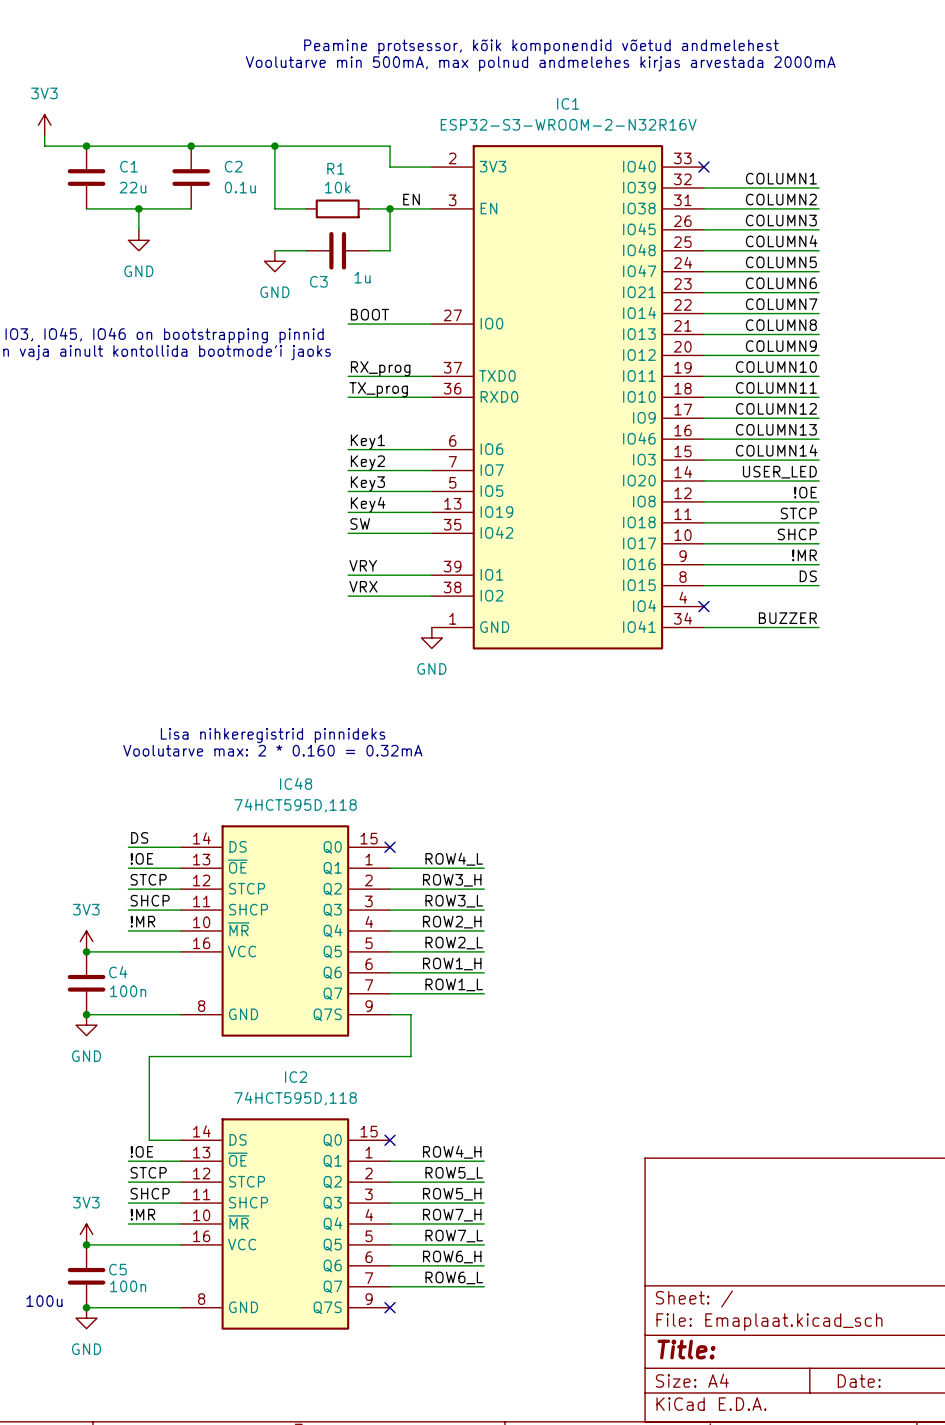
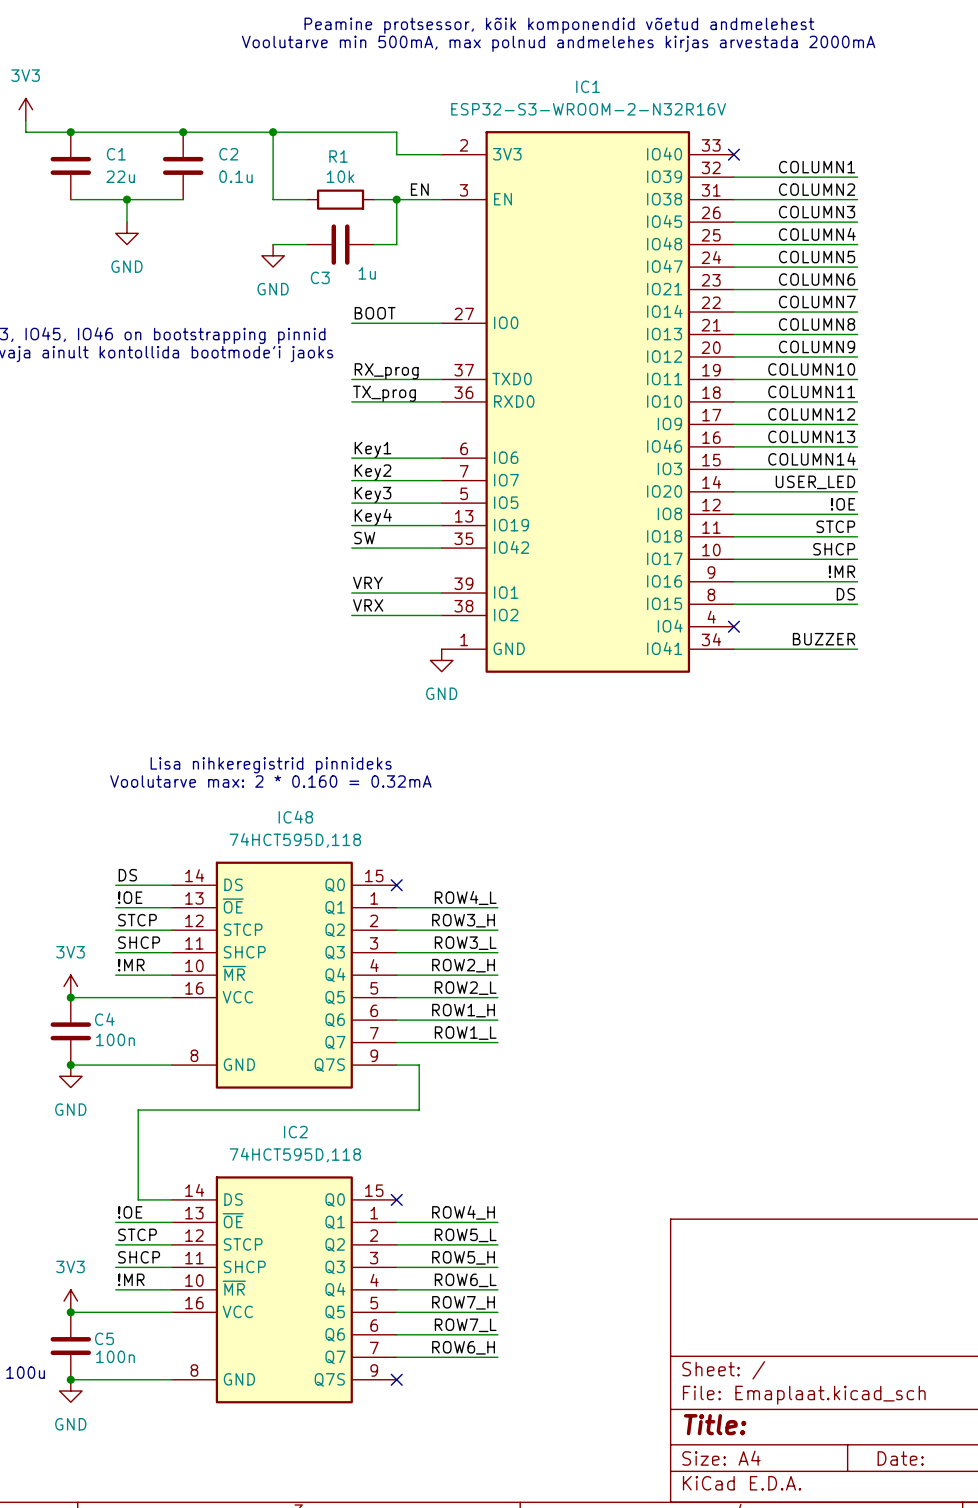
label: ROW7_H (452, 1215) -> ROW6_L (465, 1280)
label: ROW7_L (454, 1236) -> ROW7_H (463, 1302)
label: ROW6_H (452, 1257) -> ROW7_L (465, 1325)
label: ROW6_L (454, 1277) -> ROW6_H (463, 1347)

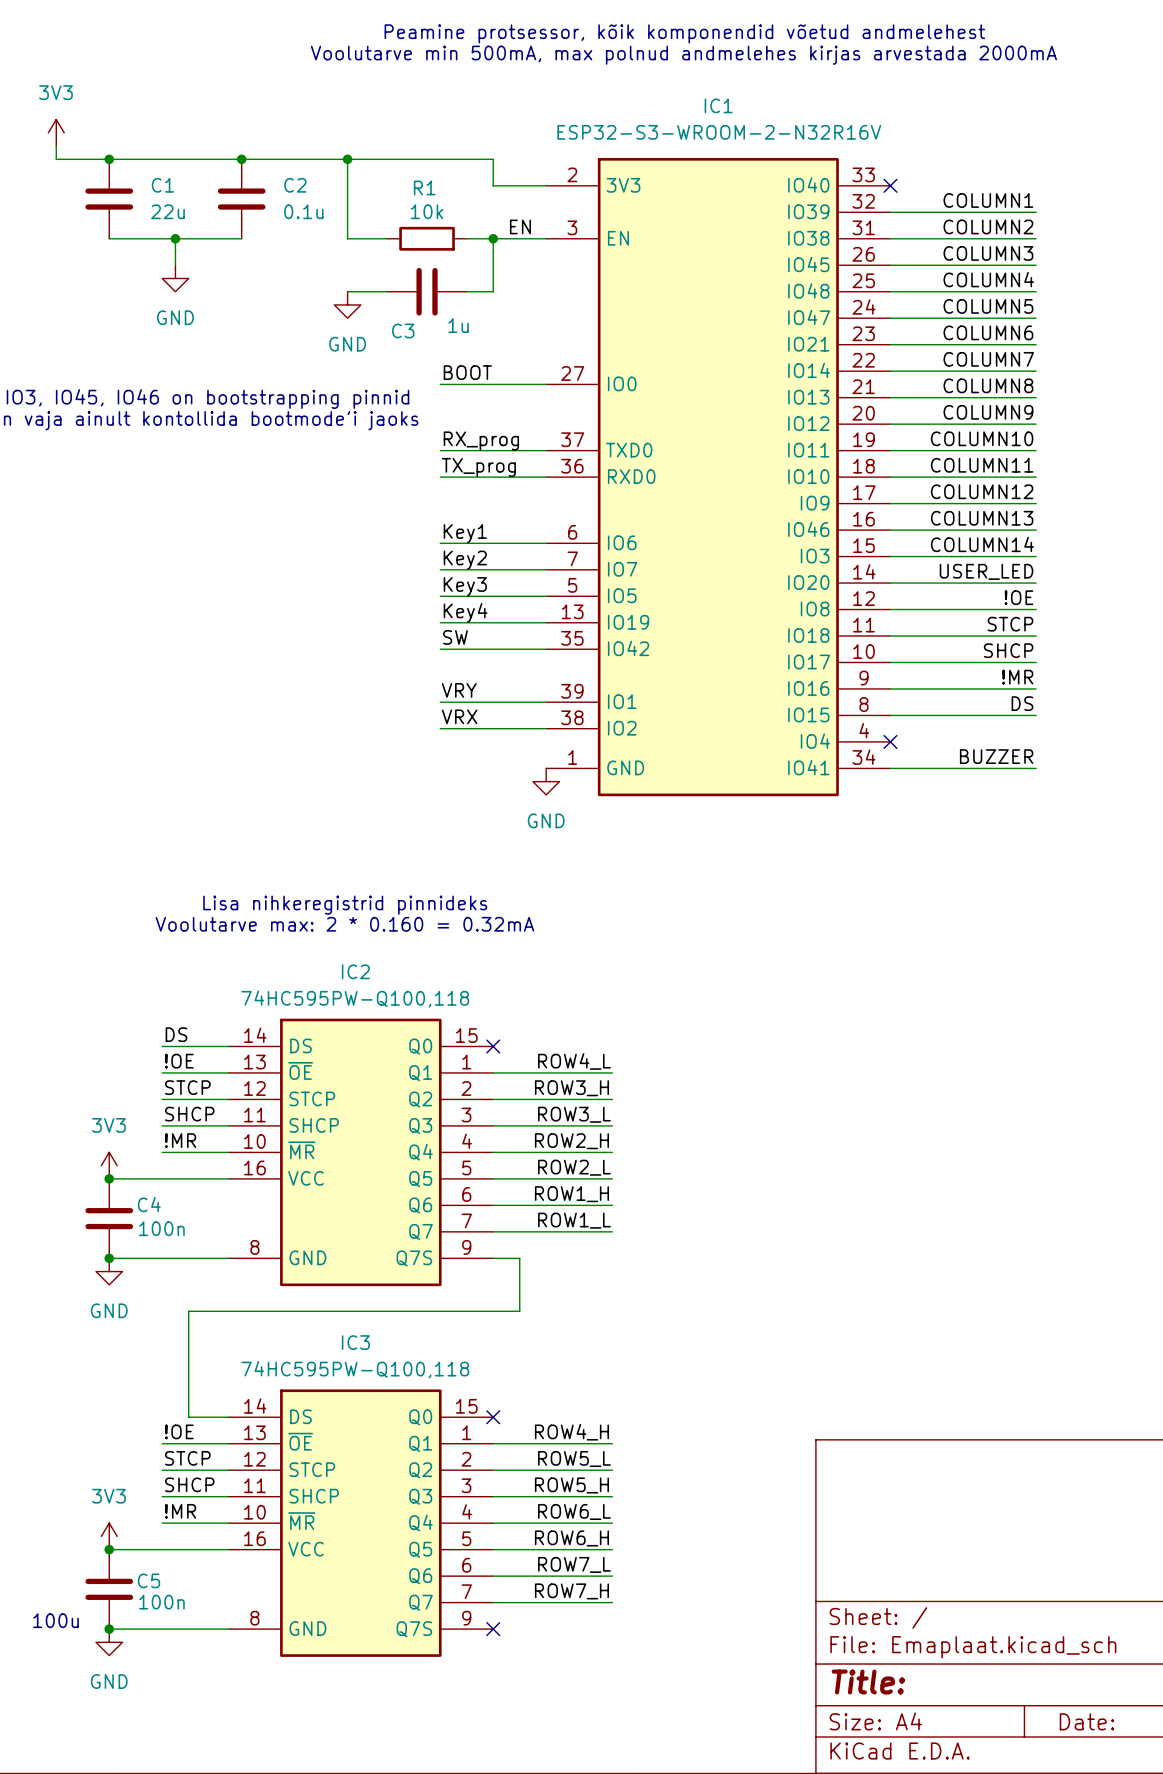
IC48 name: IC48 (295, 817) -> IC2 (355, 971)
IC48 value: 74HCT595D,118 (295, 840) -> 74HC595PW-Q100,118 (355, 998)
IC2 name: IC2 (295, 1132) -> IC3 (355, 1342)
IC2 value: 74HCT595D,118 (295, 1155) -> 74HC595PW-Q100,118 (355, 1369)
label: ROW7_H (463, 1302) -> ROW6_H (571, 1538)
label: ROW6_H (463, 1347) -> ROW7_H (571, 1591)

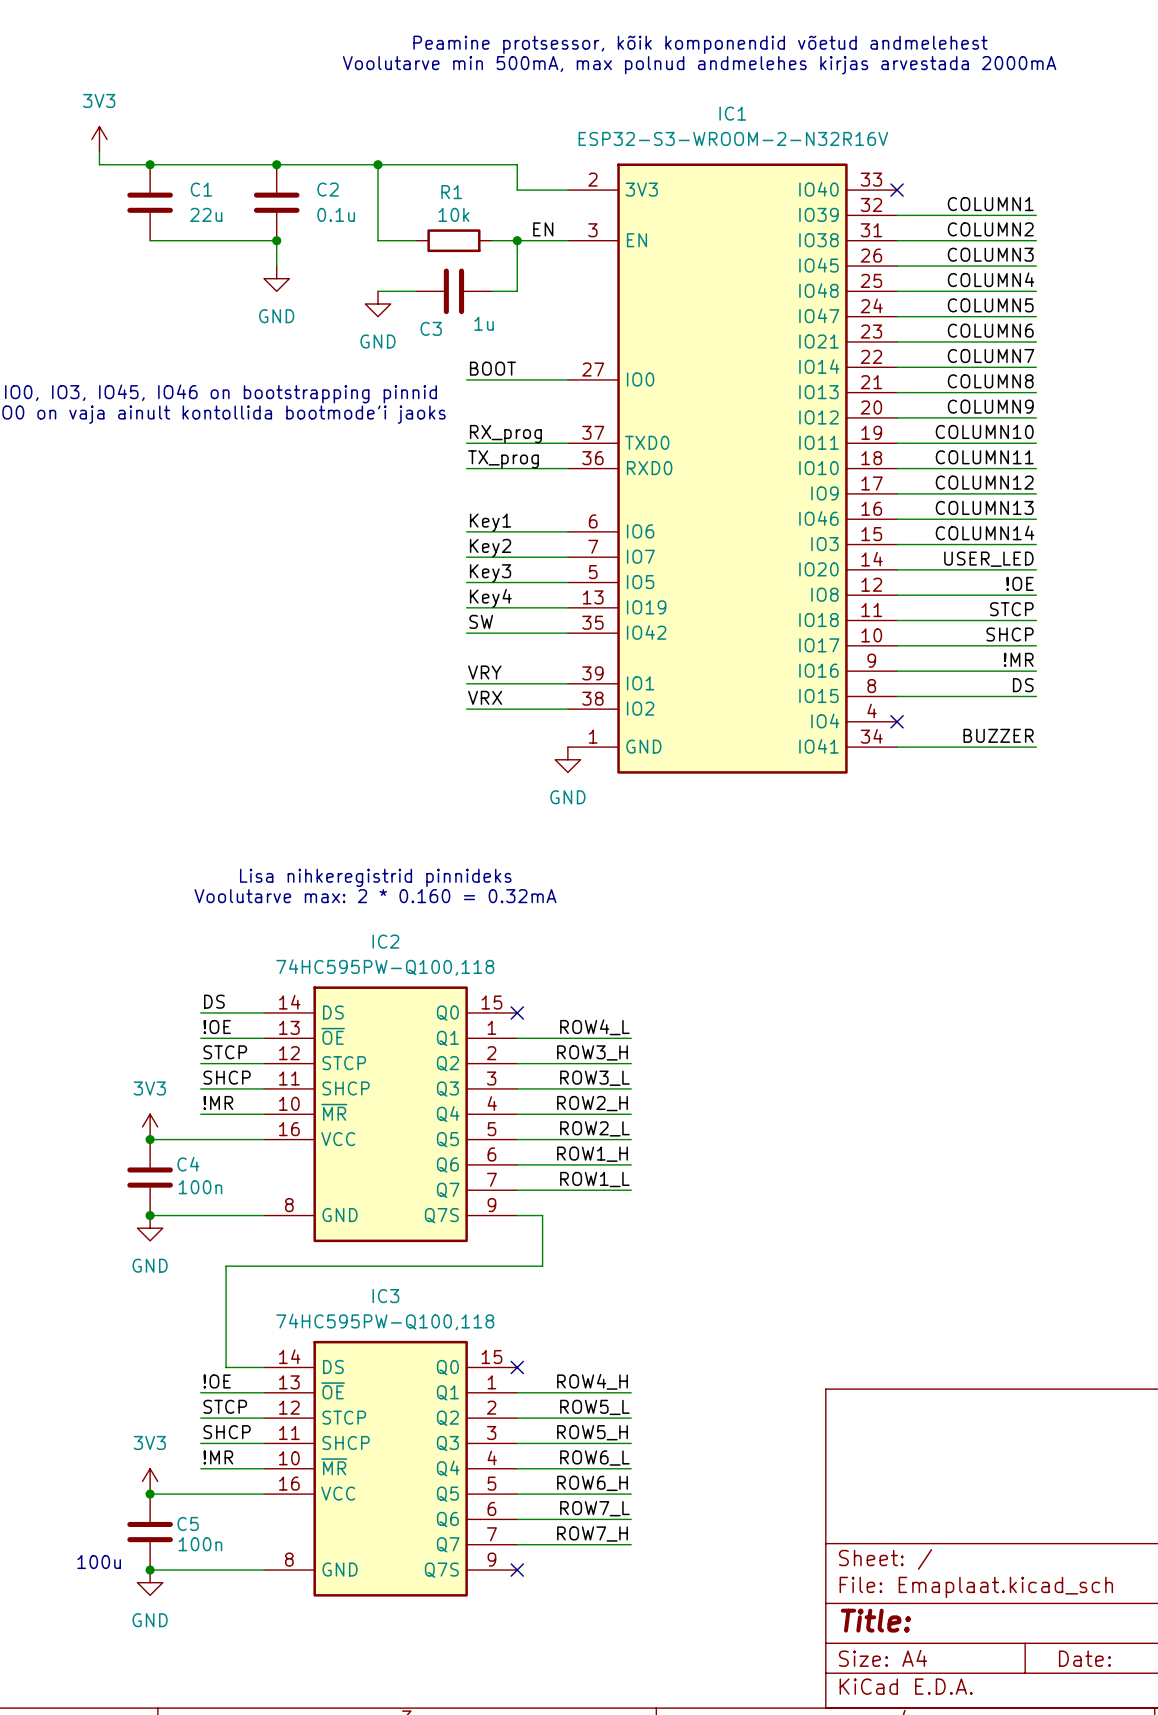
wire: (175, 238) (175, 265) -> (276, 240) (276, 266)
junction: (175, 238) -> none
junction: none -> (276, 240)
power symbol position: GND (175, 278) -> GND (276, 278)

